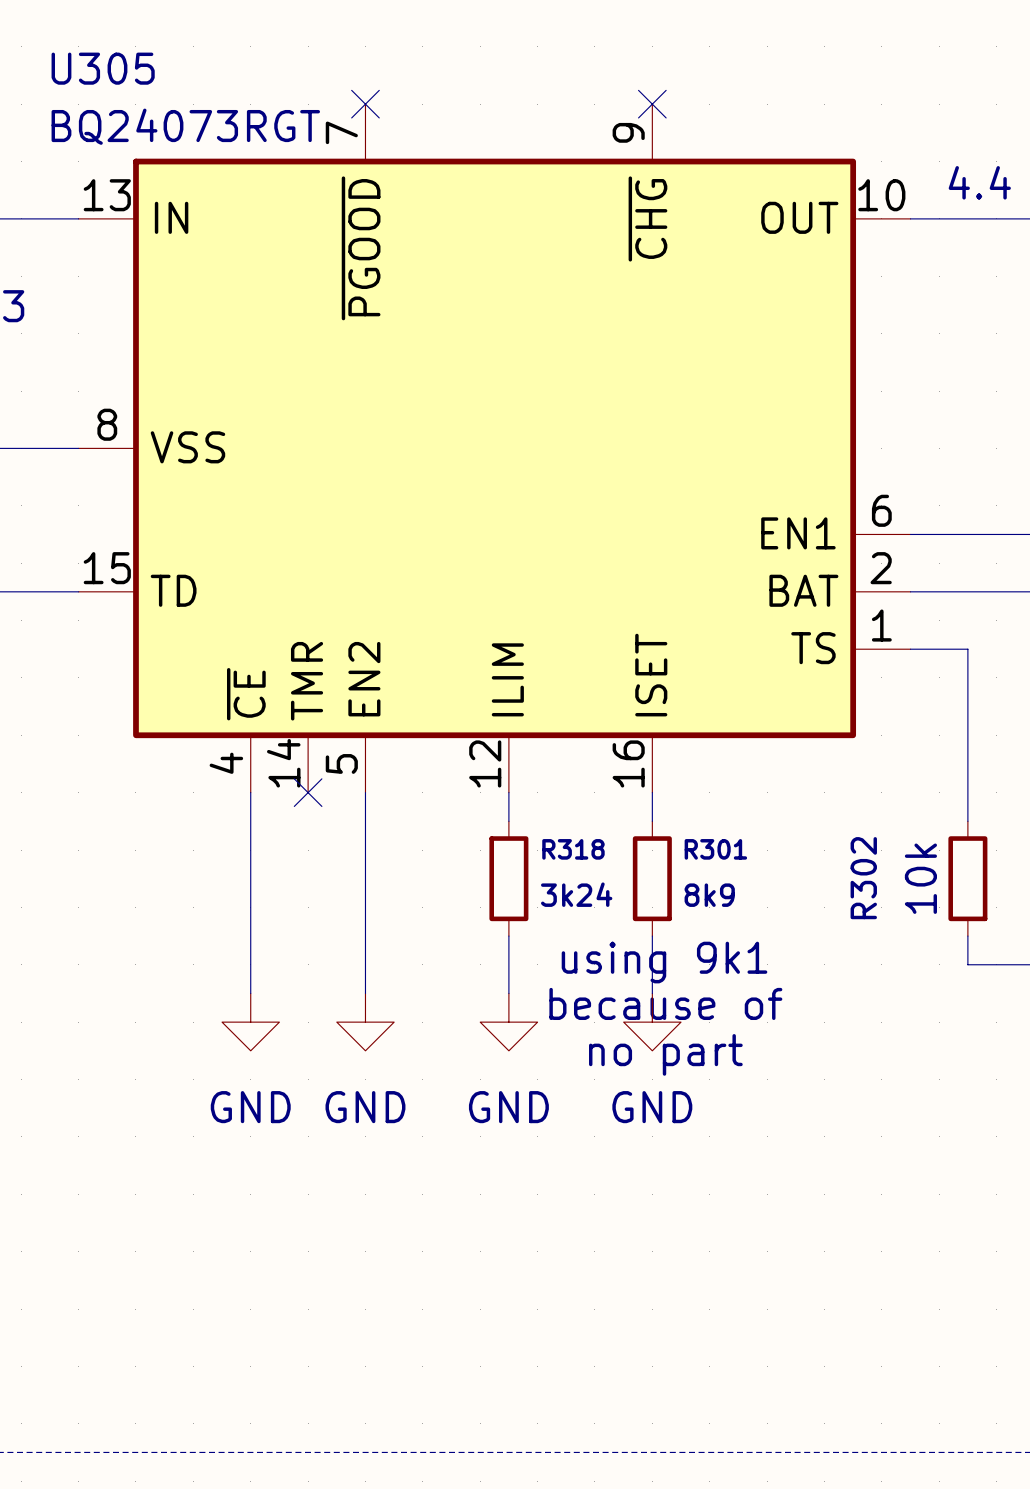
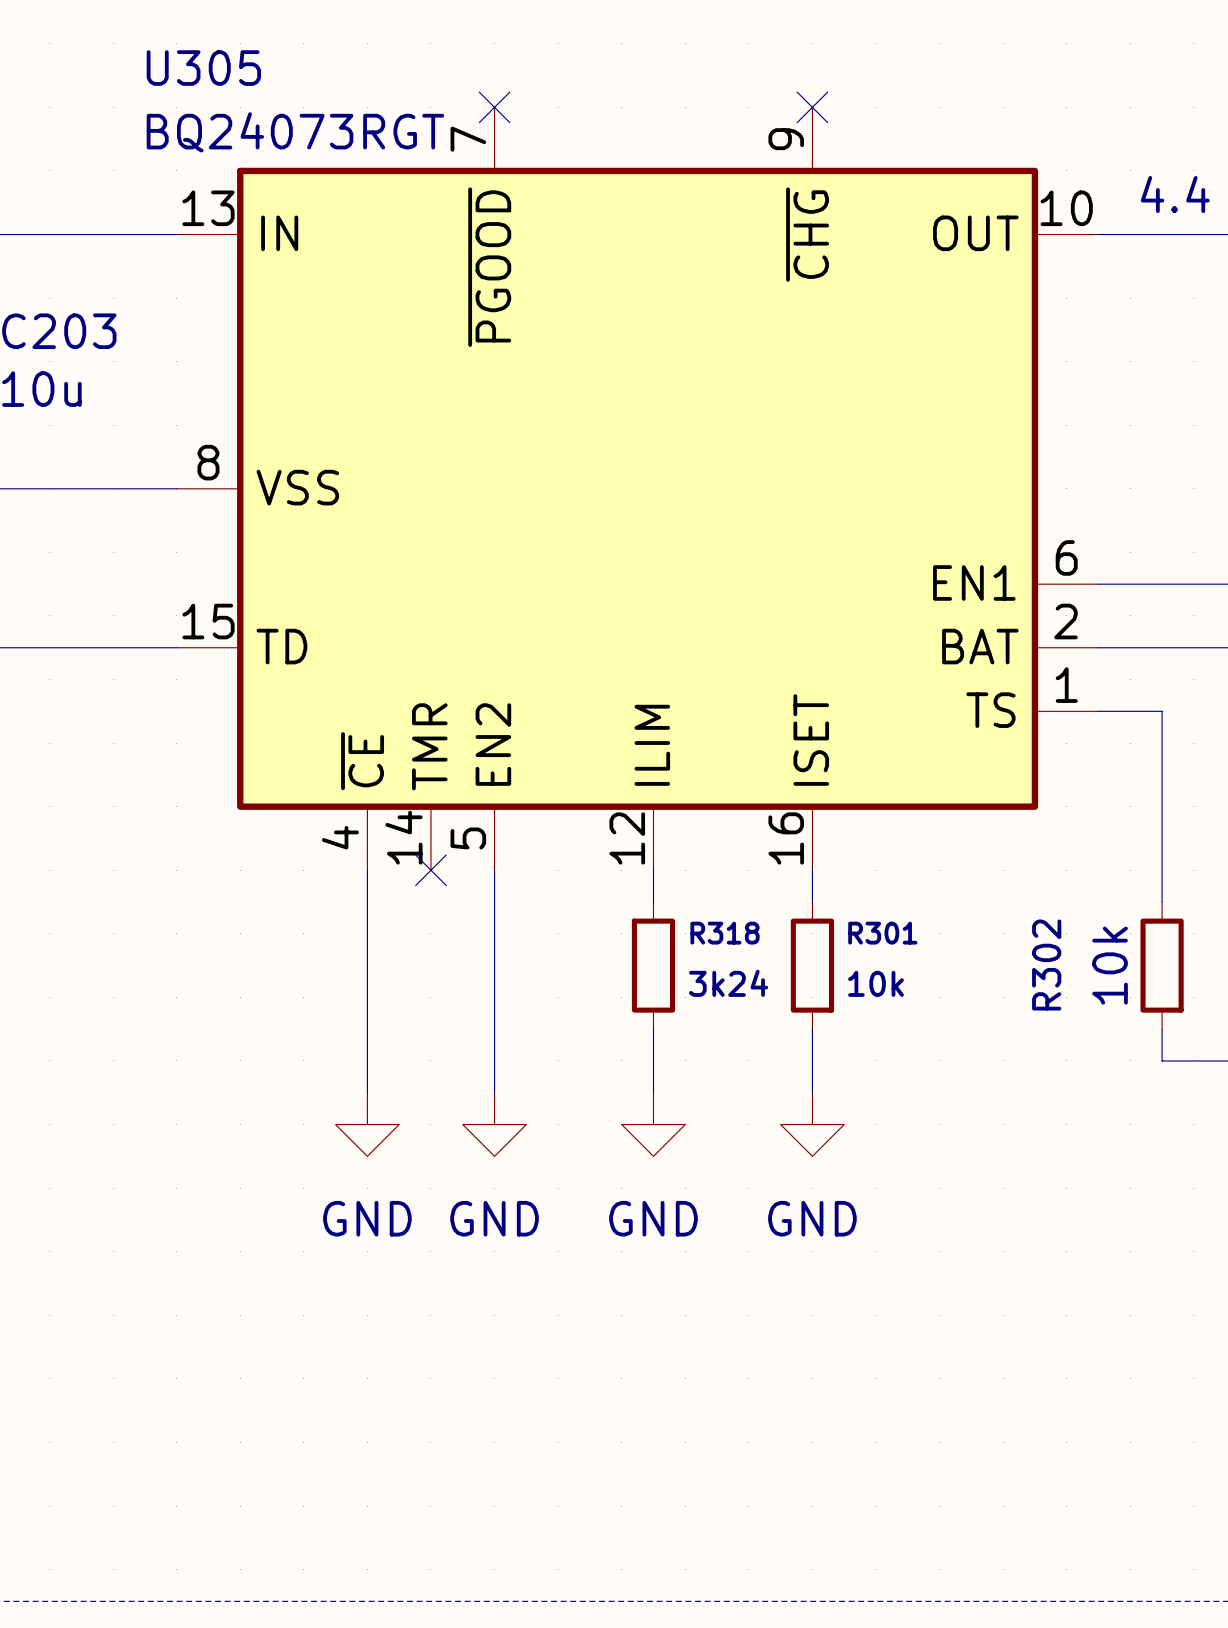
R301 value: 8k9 (709, 895) -> 10k (876, 983)
text: using 9k1 (664, 962) -> none
text: because of (665, 1003) -> none
text: no part (665, 1054) -> none

